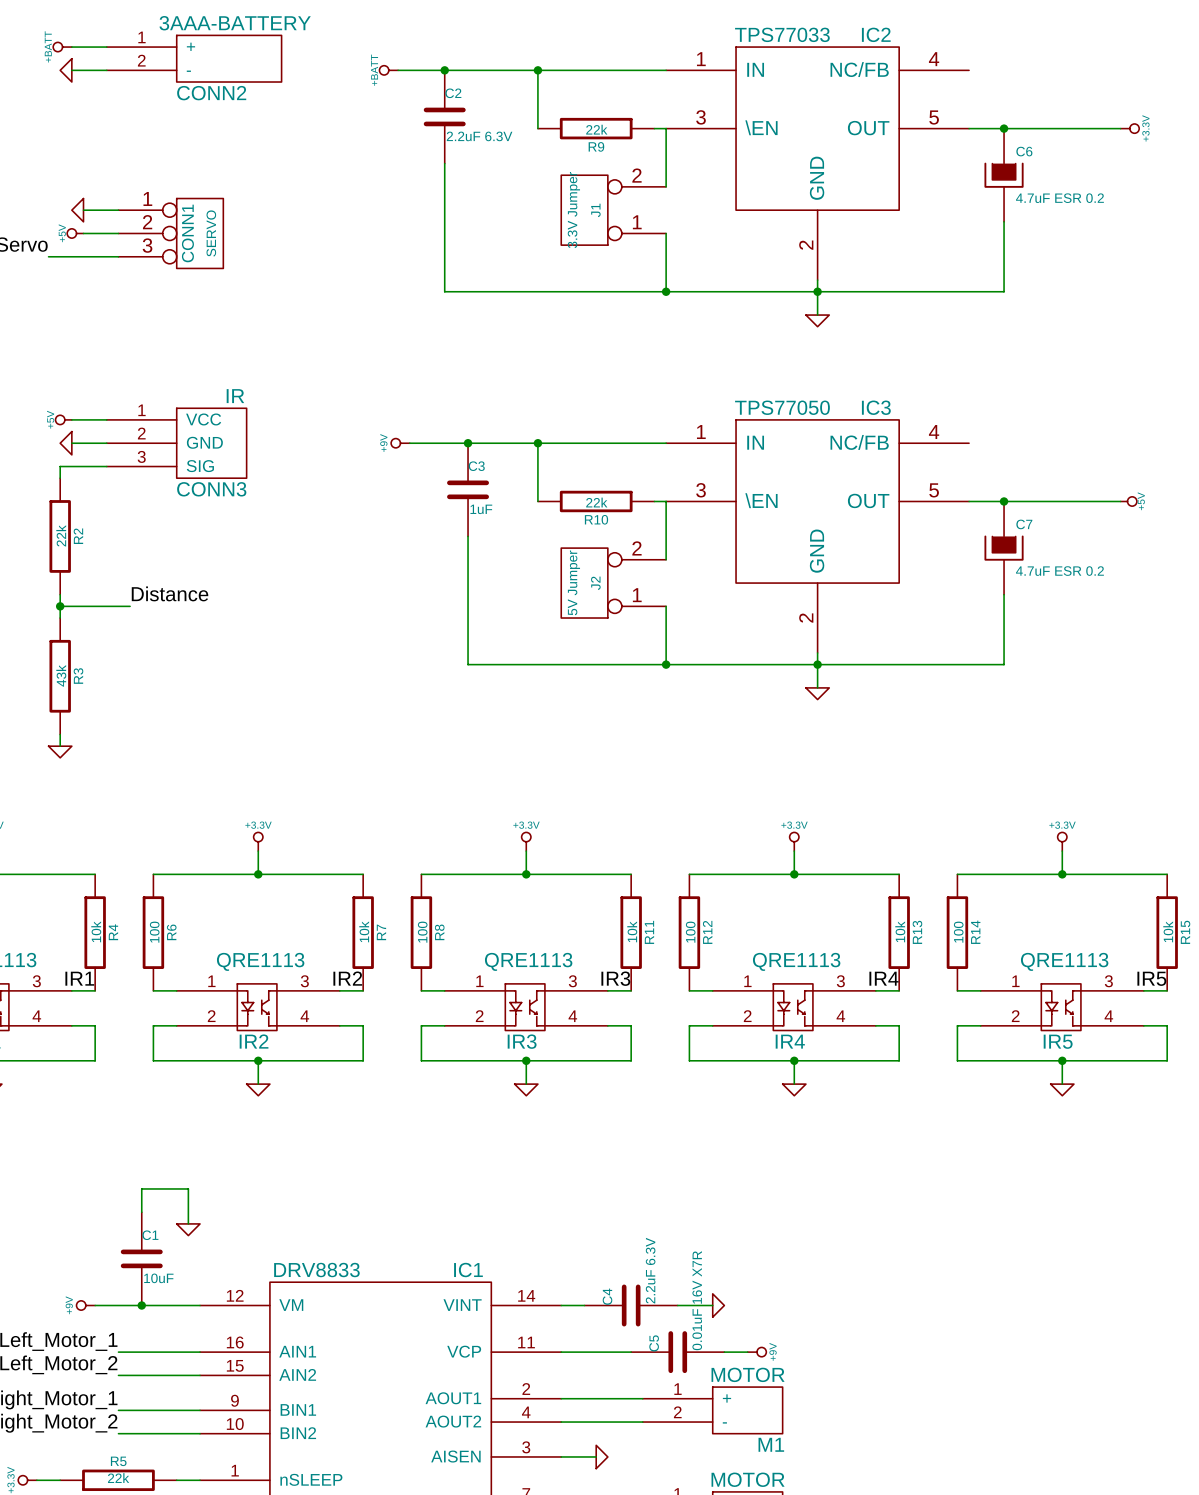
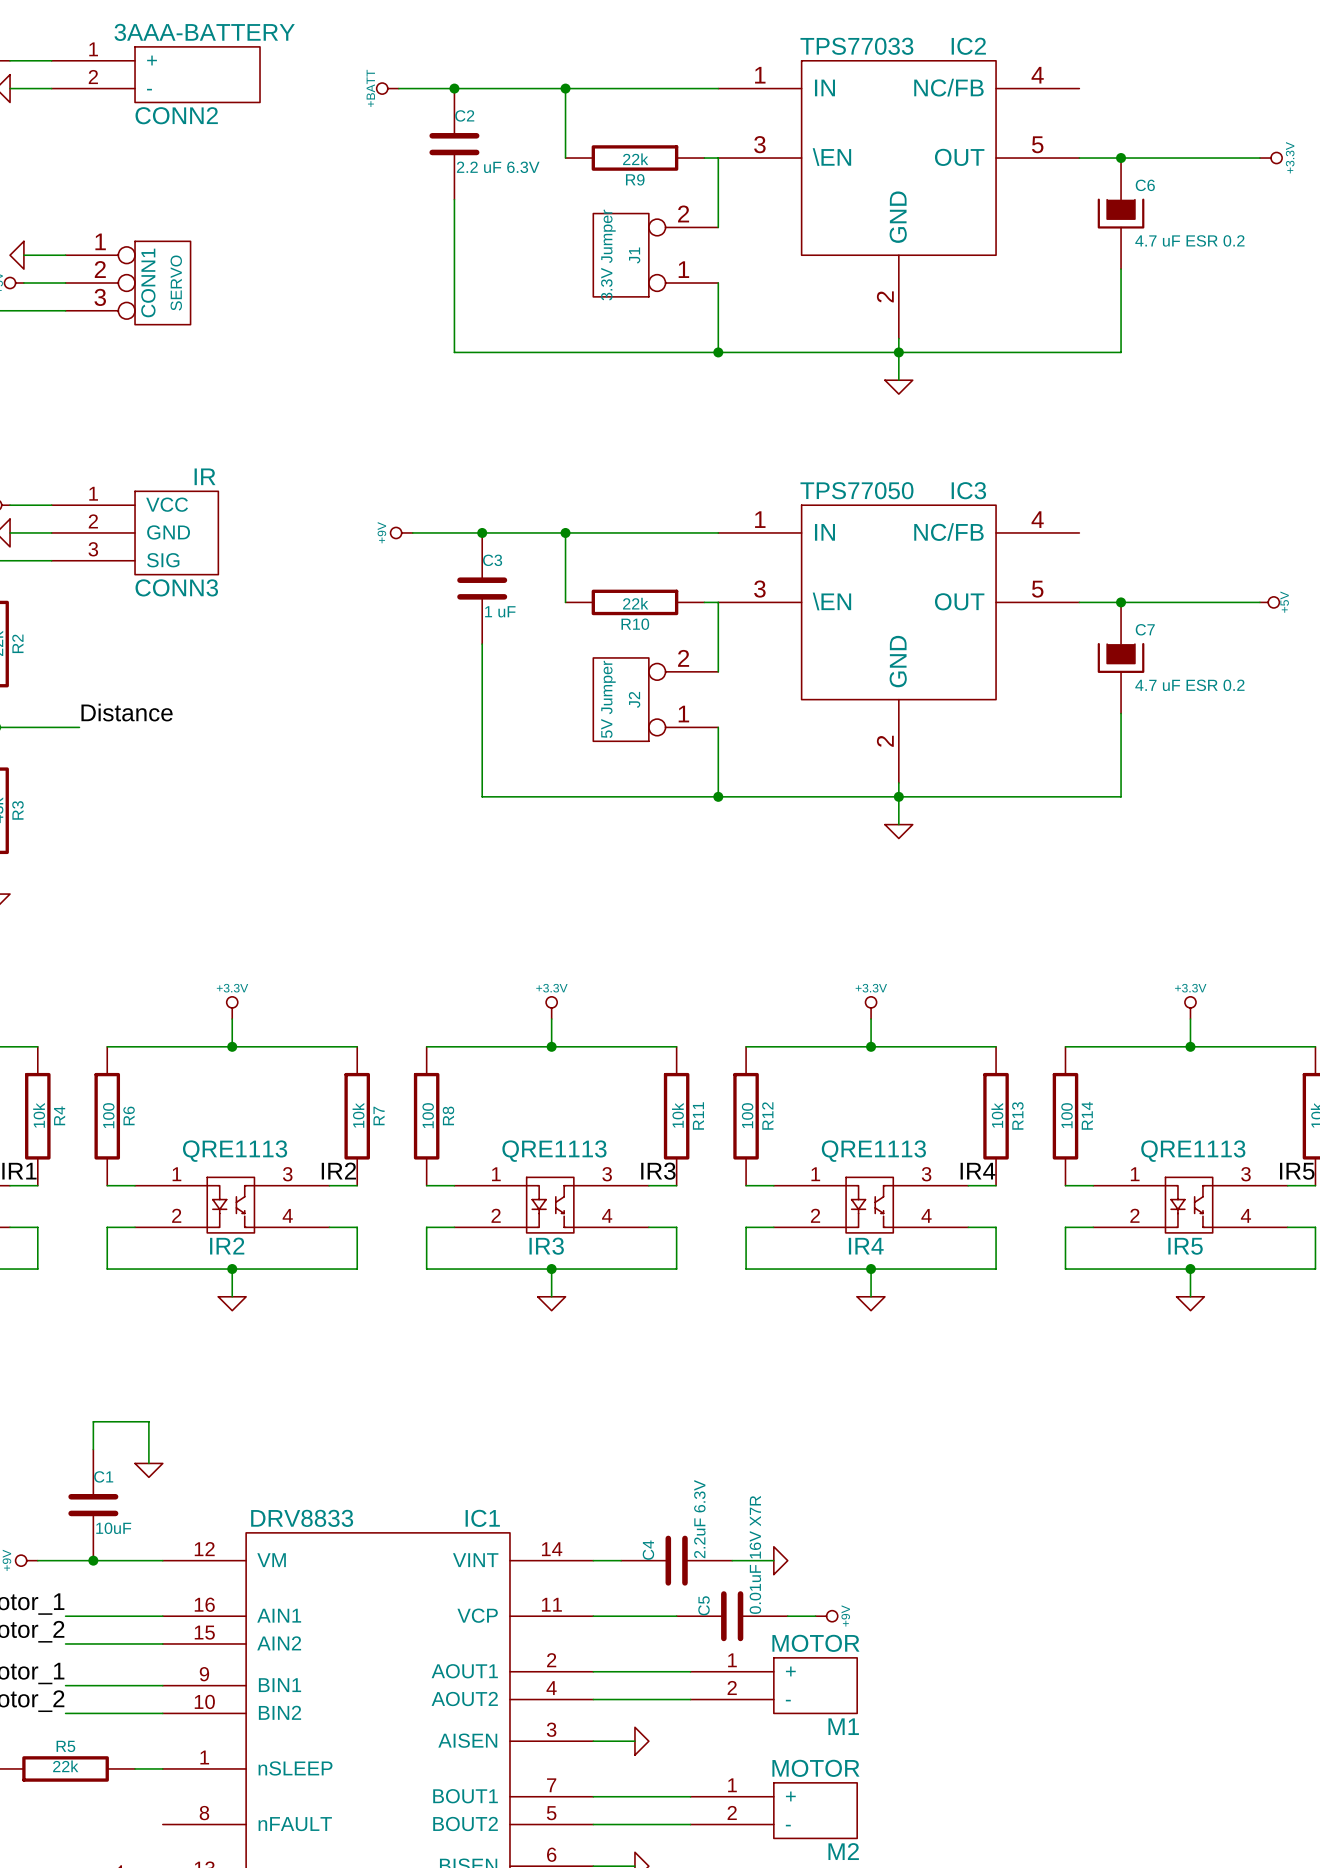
C2 value: 2.2uF 6.3V (479, 136) -> 2.2 uF 6.3V (498, 167)
C6 value: 4.7uF ESR 0.2 (1059, 198) -> 4.7 uF ESR 0.2 (1189, 240)
C3 value: 1uF (481, 509) -> 1 uF (500, 611)
C7 value: 4.7uF ESR 0.2 (1059, 571) -> 4.7 uF ESR 0.2 (1189, 685)

